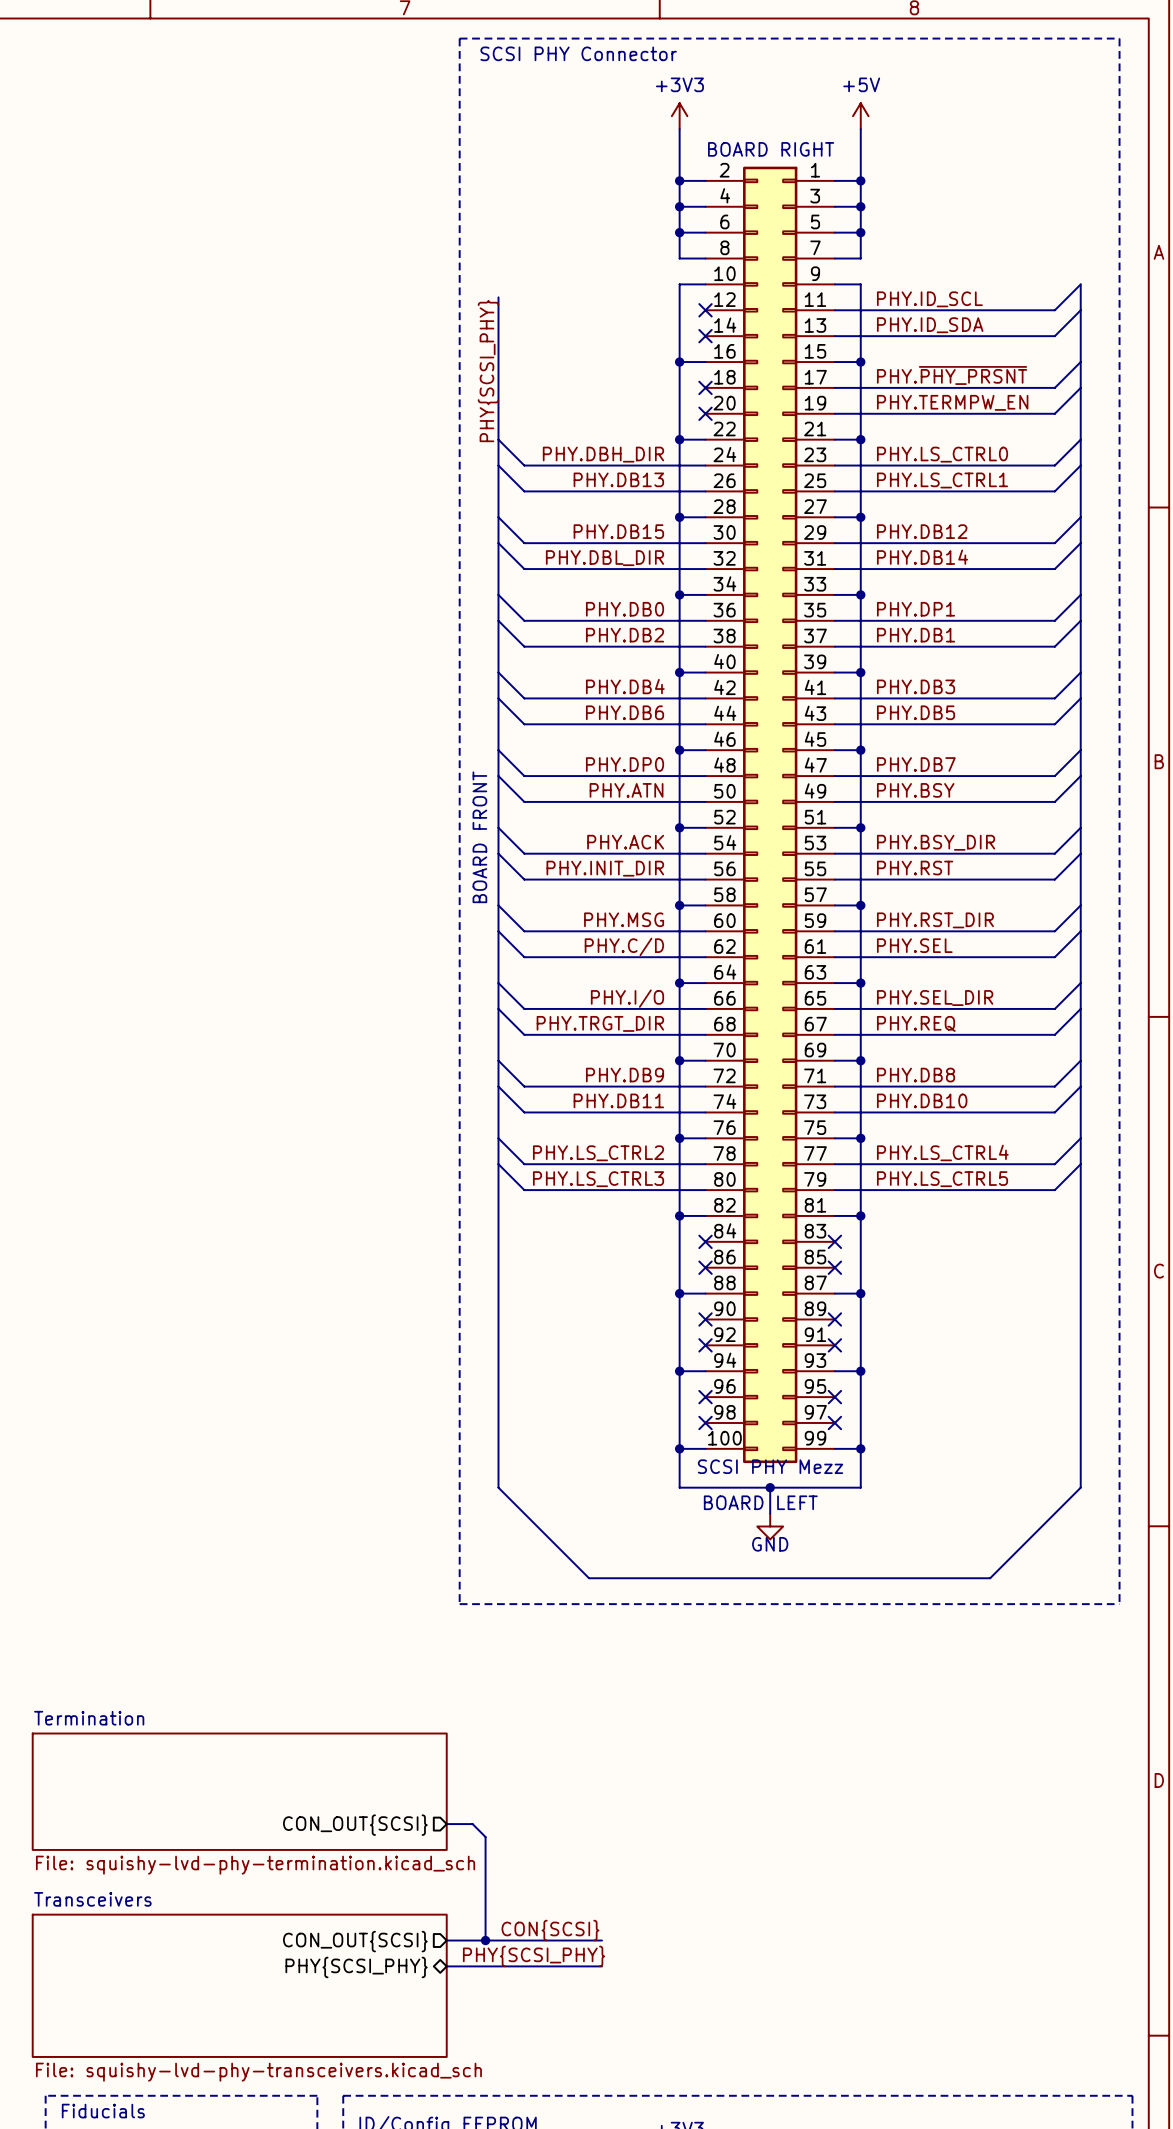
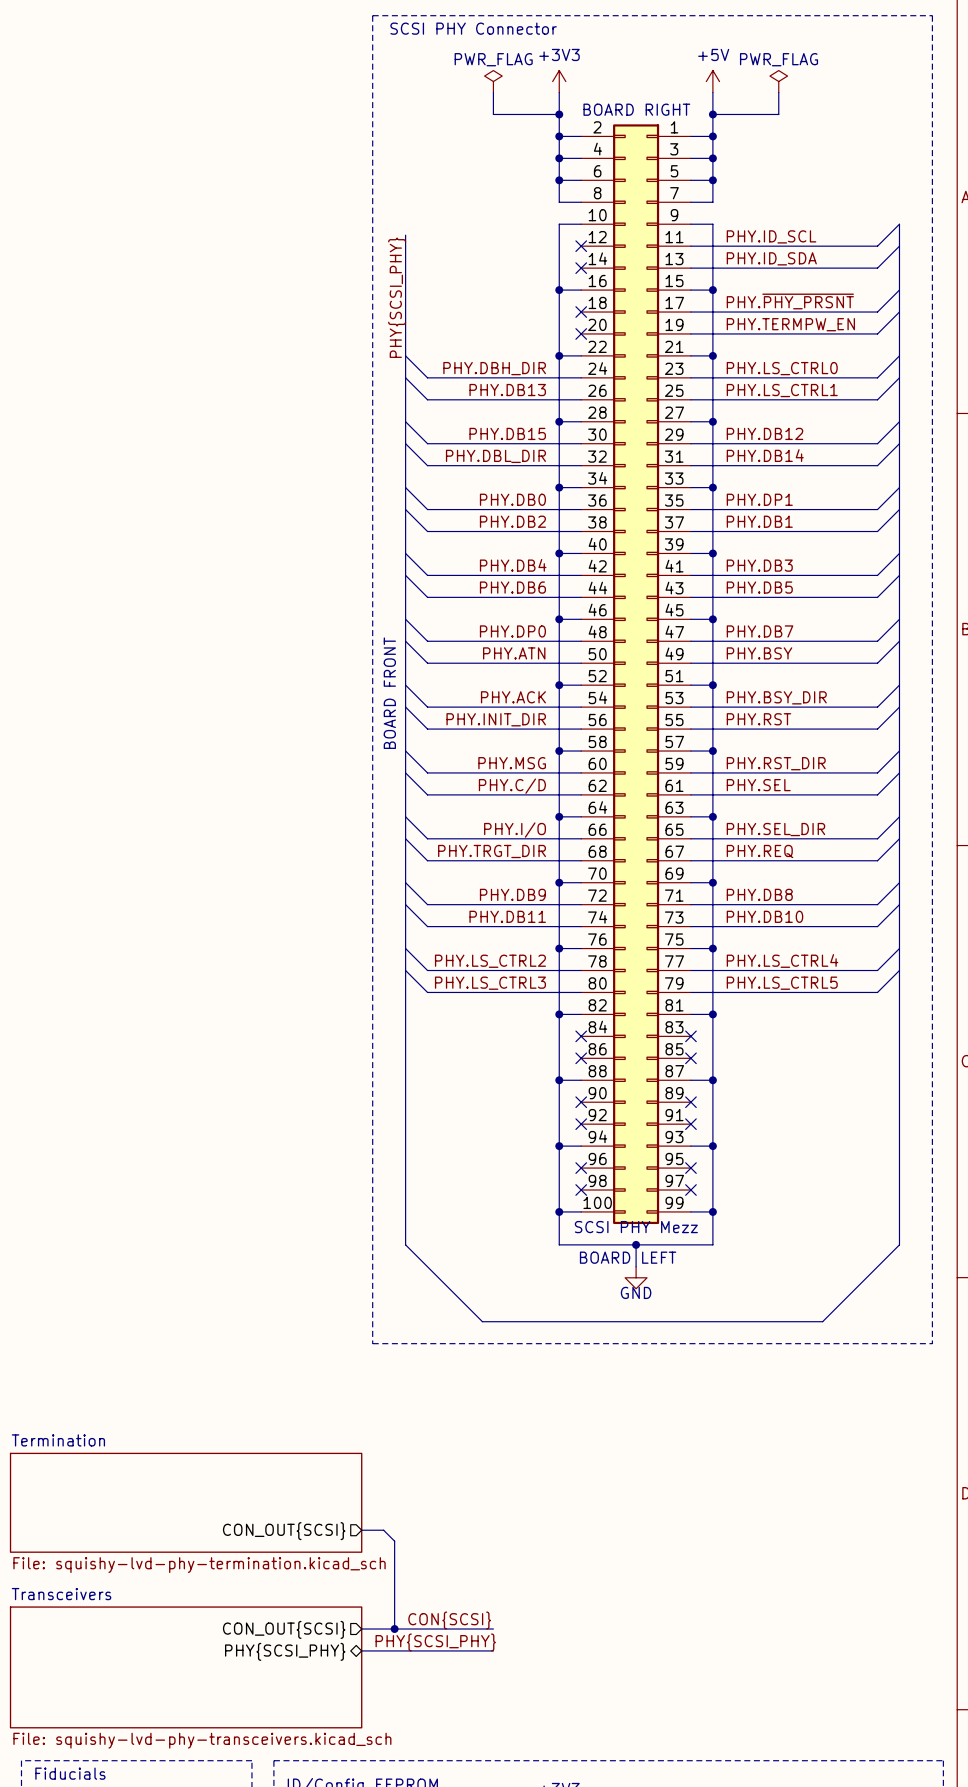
power symbol: none -> PWR_FLAG (493, 81)
power symbol: none -> PWR_FLAG (778, 81)
wire: none -> (493, 92) (493, 114) (559, 114)
wire: none -> (778, 92) (778, 114) (712, 114)
junction: none -> (559, 114)
junction: none -> (712, 114)

